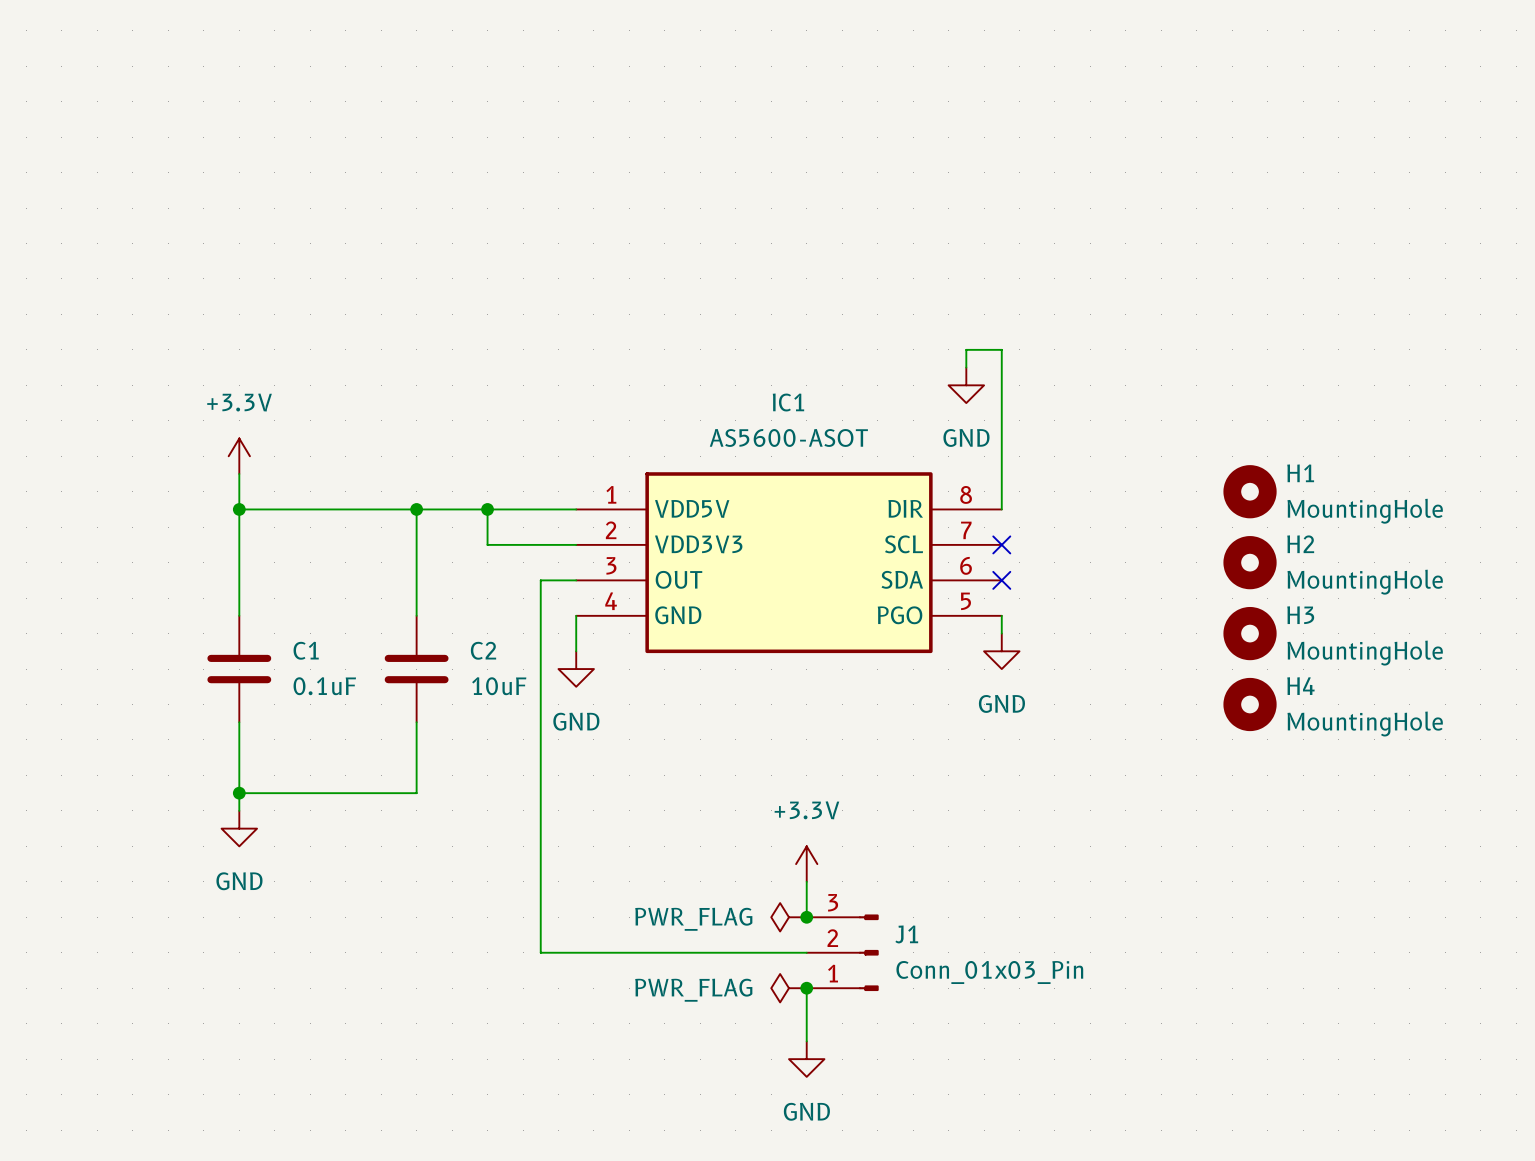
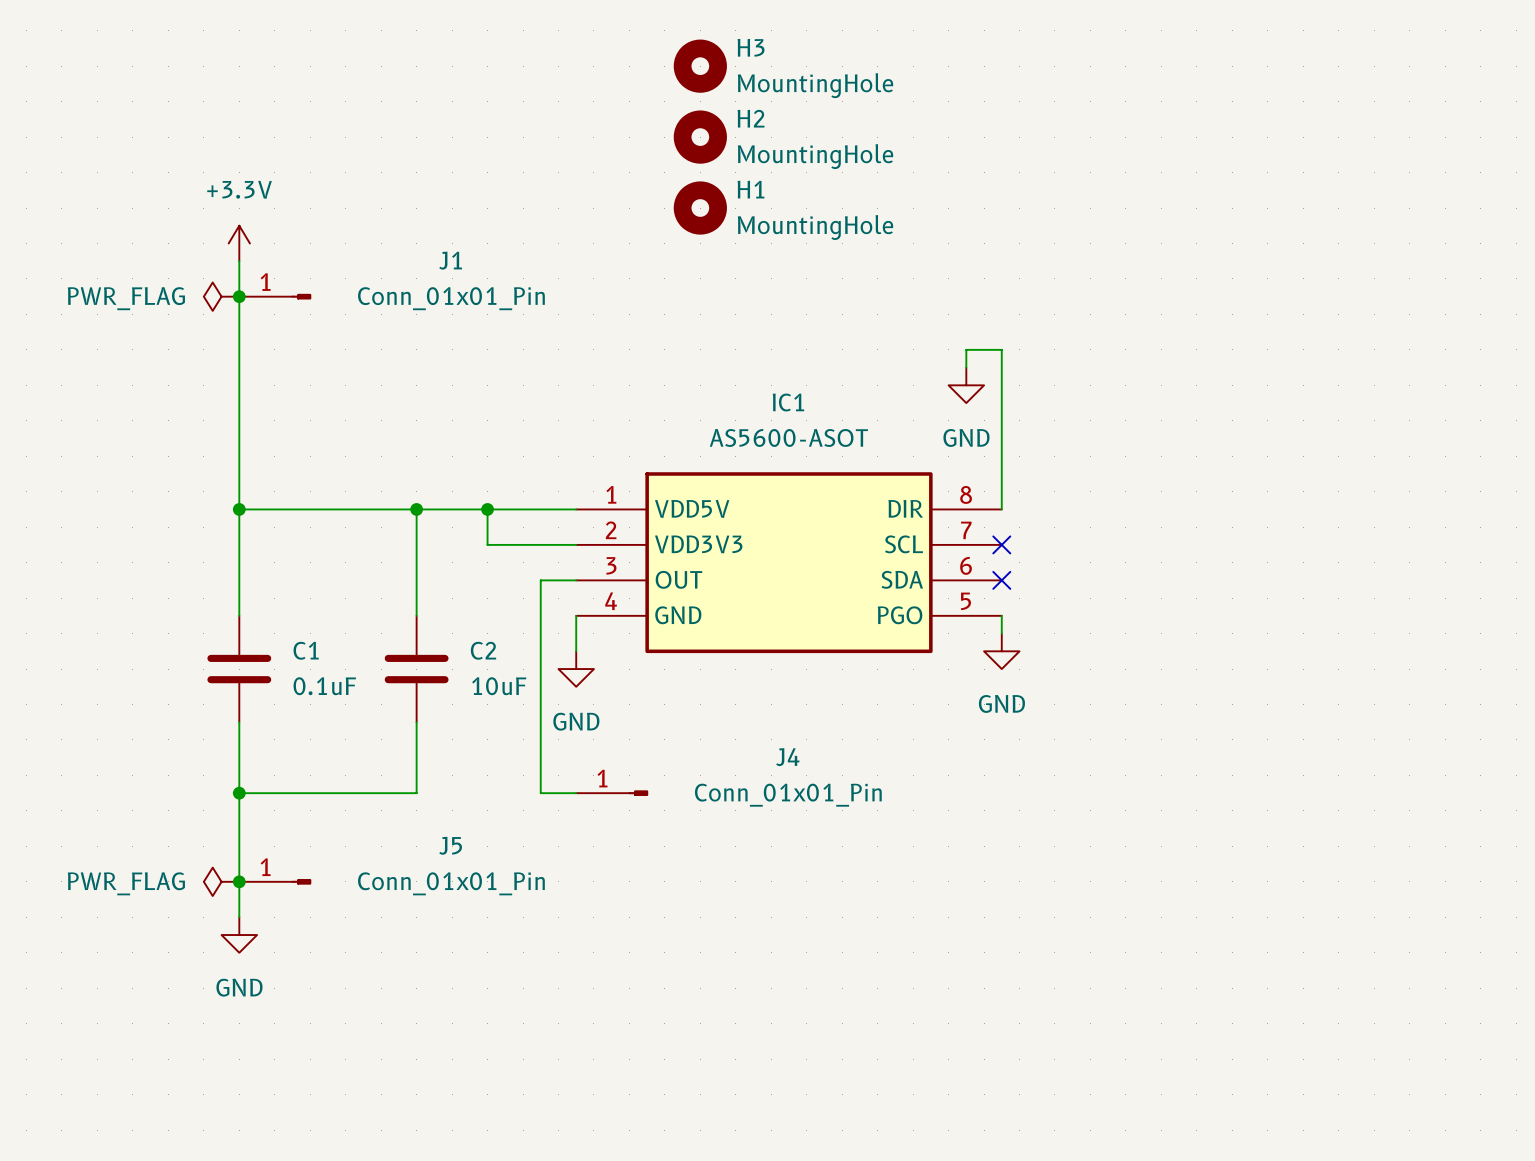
wire: none -> (239, 261) (239, 473)
power symbol: none -> PWR_FLAG (221, 296)
junction: none -> (239, 296)
power symbol position: +3.3V (239, 456) -> +3.3V (239, 243)
H1 position: (1250, 491) -> (700, 208)
H2 position: (1250, 562) -> (700, 137)
H3 position: (1250, 633) -> (700, 66)
H4: MountingHole (1250, 704) -> none
wire: (540, 793) (540, 952) (806, 952) -> (540, 793) (576, 793)
J4: none -> Conn_01x01_Pin (612, 793)
wire: none -> (239, 810) (239, 917)
power symbol position: GND (239, 828) -> GND (239, 935)
power symbol: +3.3V (806, 864) -> none
power symbol: none -> PWR_FLAG (221, 881)
junction: none -> (239, 881)
J5: none -> Conn_01x01_Pin (275, 881)
wire: (806, 881) (806, 917) -> none
J1 symbol: [806, 914, 879, 992] -> [239, 293, 312, 300]
power symbol: PWR_FLAG (788, 917) -> none
junction: (806, 917) -> none
J1 name position: J1 (906, 934) -> J1 (450, 260)
J1 value: Conn_01x03_Pin (989, 972) -> Conn_01x01_Pin (451, 298)
power symbol: PWR_FLAG (788, 988) -> none
wire: (806, 988) (806, 1041) -> none
junction: (806, 988) -> none
power symbol: GND (806, 1059) -> none

